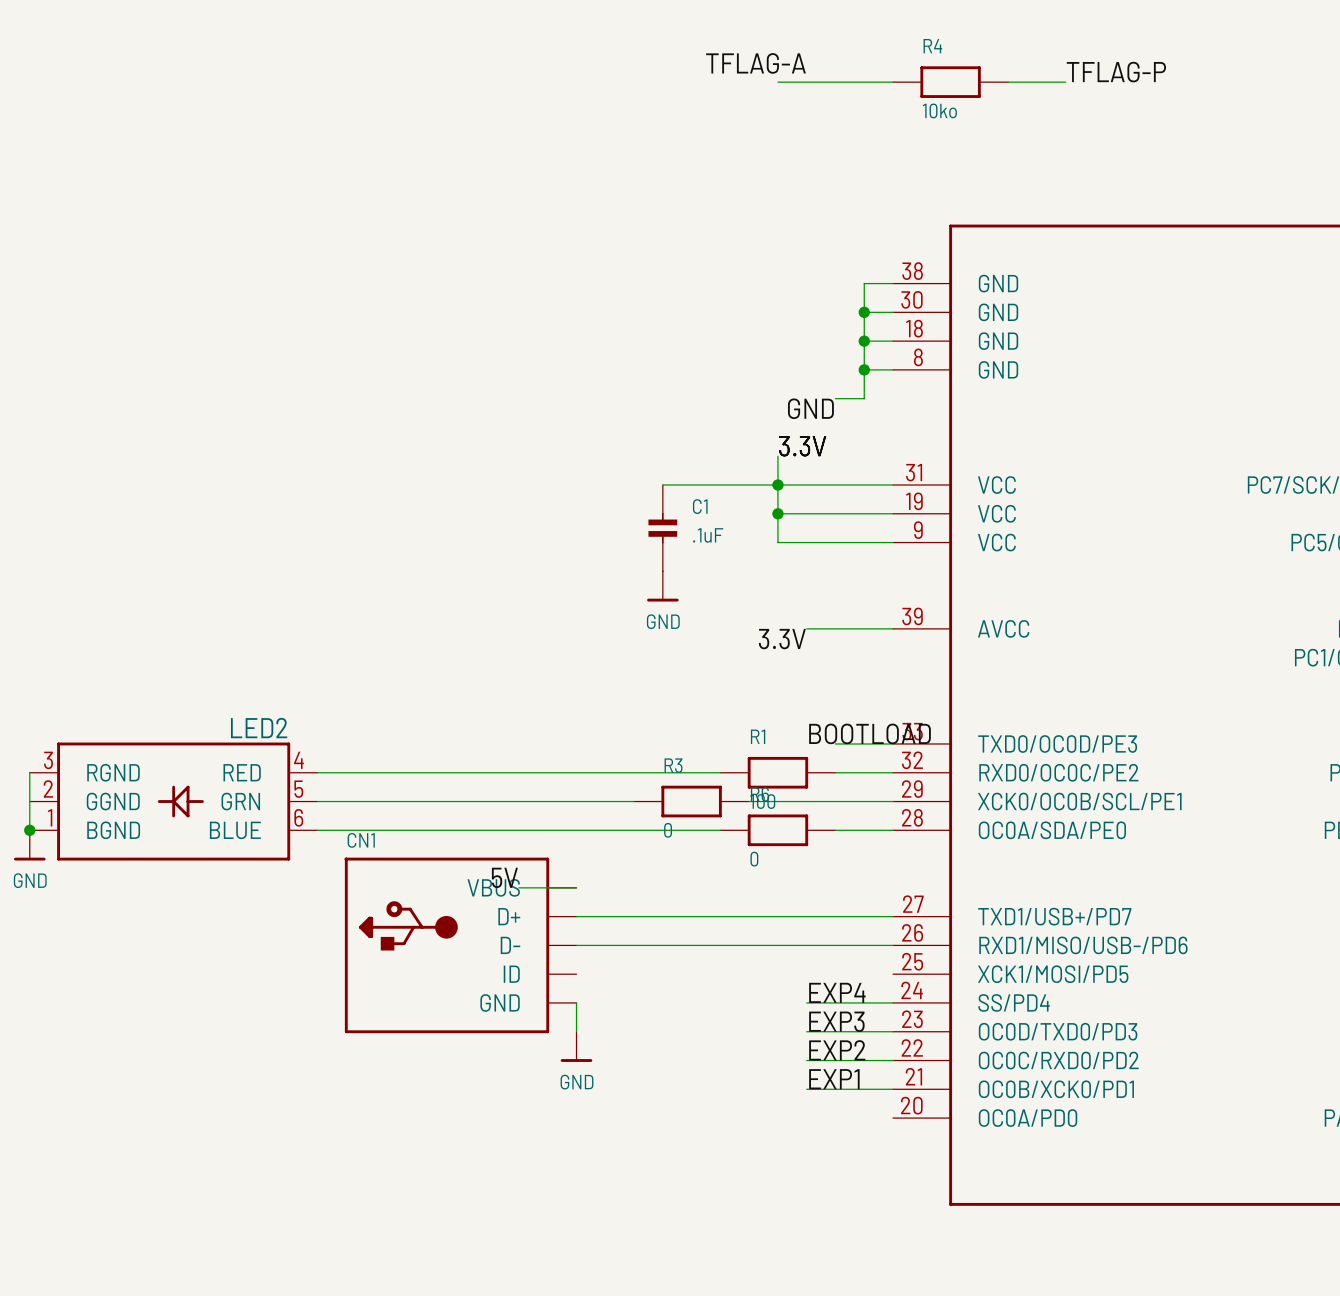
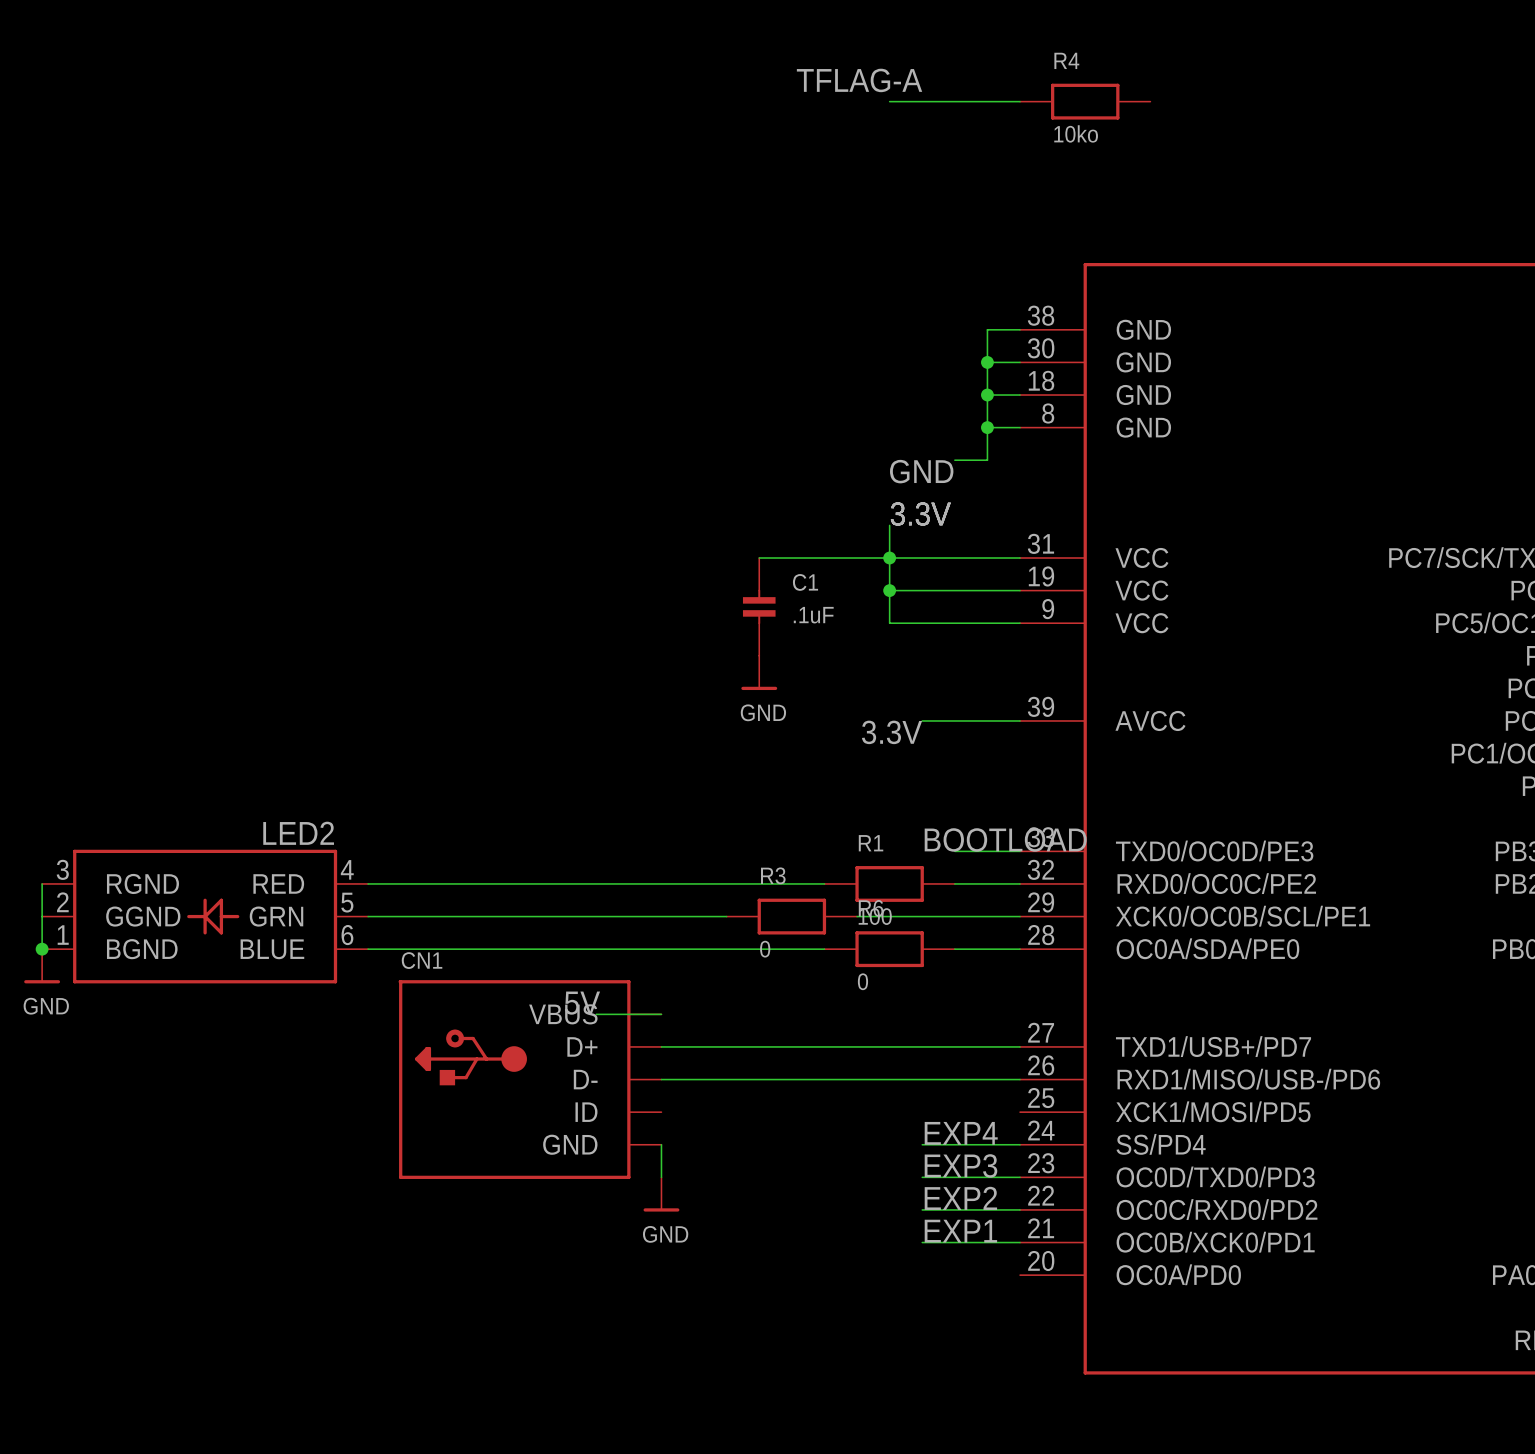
label: TFLAG-P (1116, 72) -> none
wire: (1008, 82) (1065, 82) -> none

